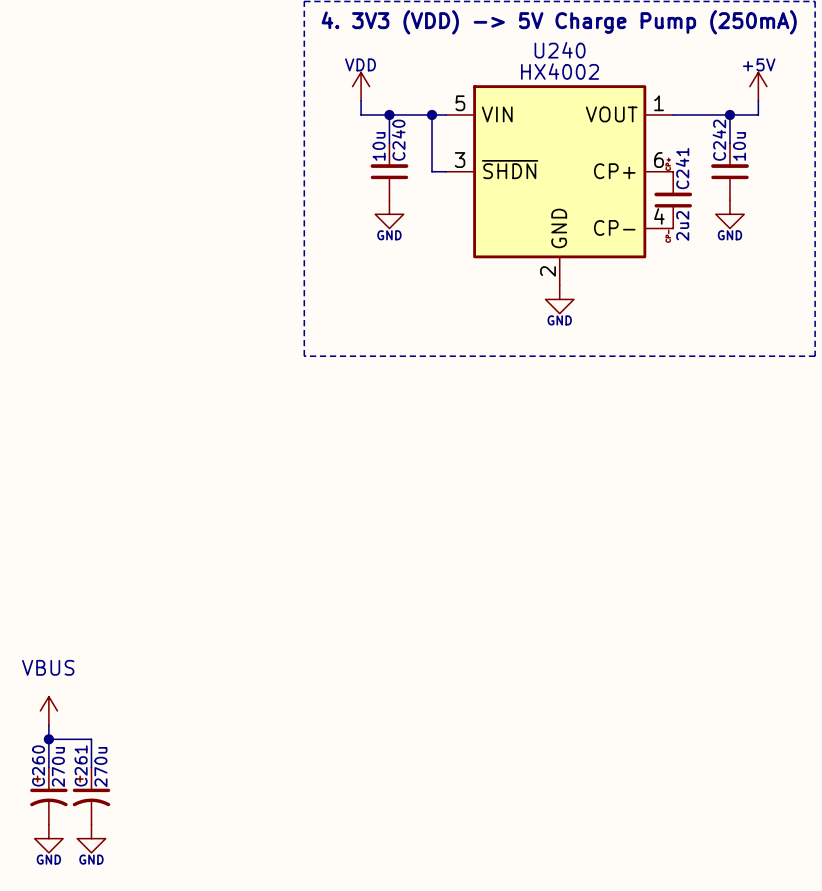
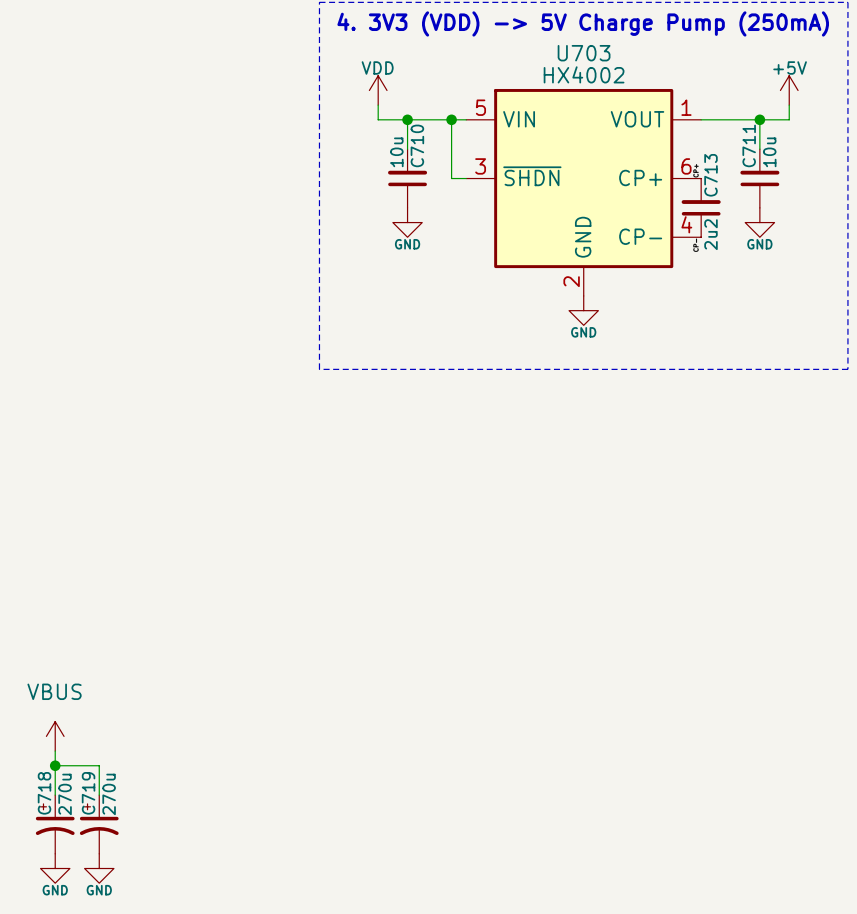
U240 name: U240 (560, 50) -> U703 (584, 53)
C240 name: C240 (398, 140) -> C710 (417, 145)
C242 name: C242 (719, 140) -> C711 (749, 145)
C241 name: C241 (682, 168) -> C713 (710, 175)
C260 name: C260 (38, 765) -> C718 (44, 793)
C261 name: C261 (81, 765) -> C719 (88, 793)

